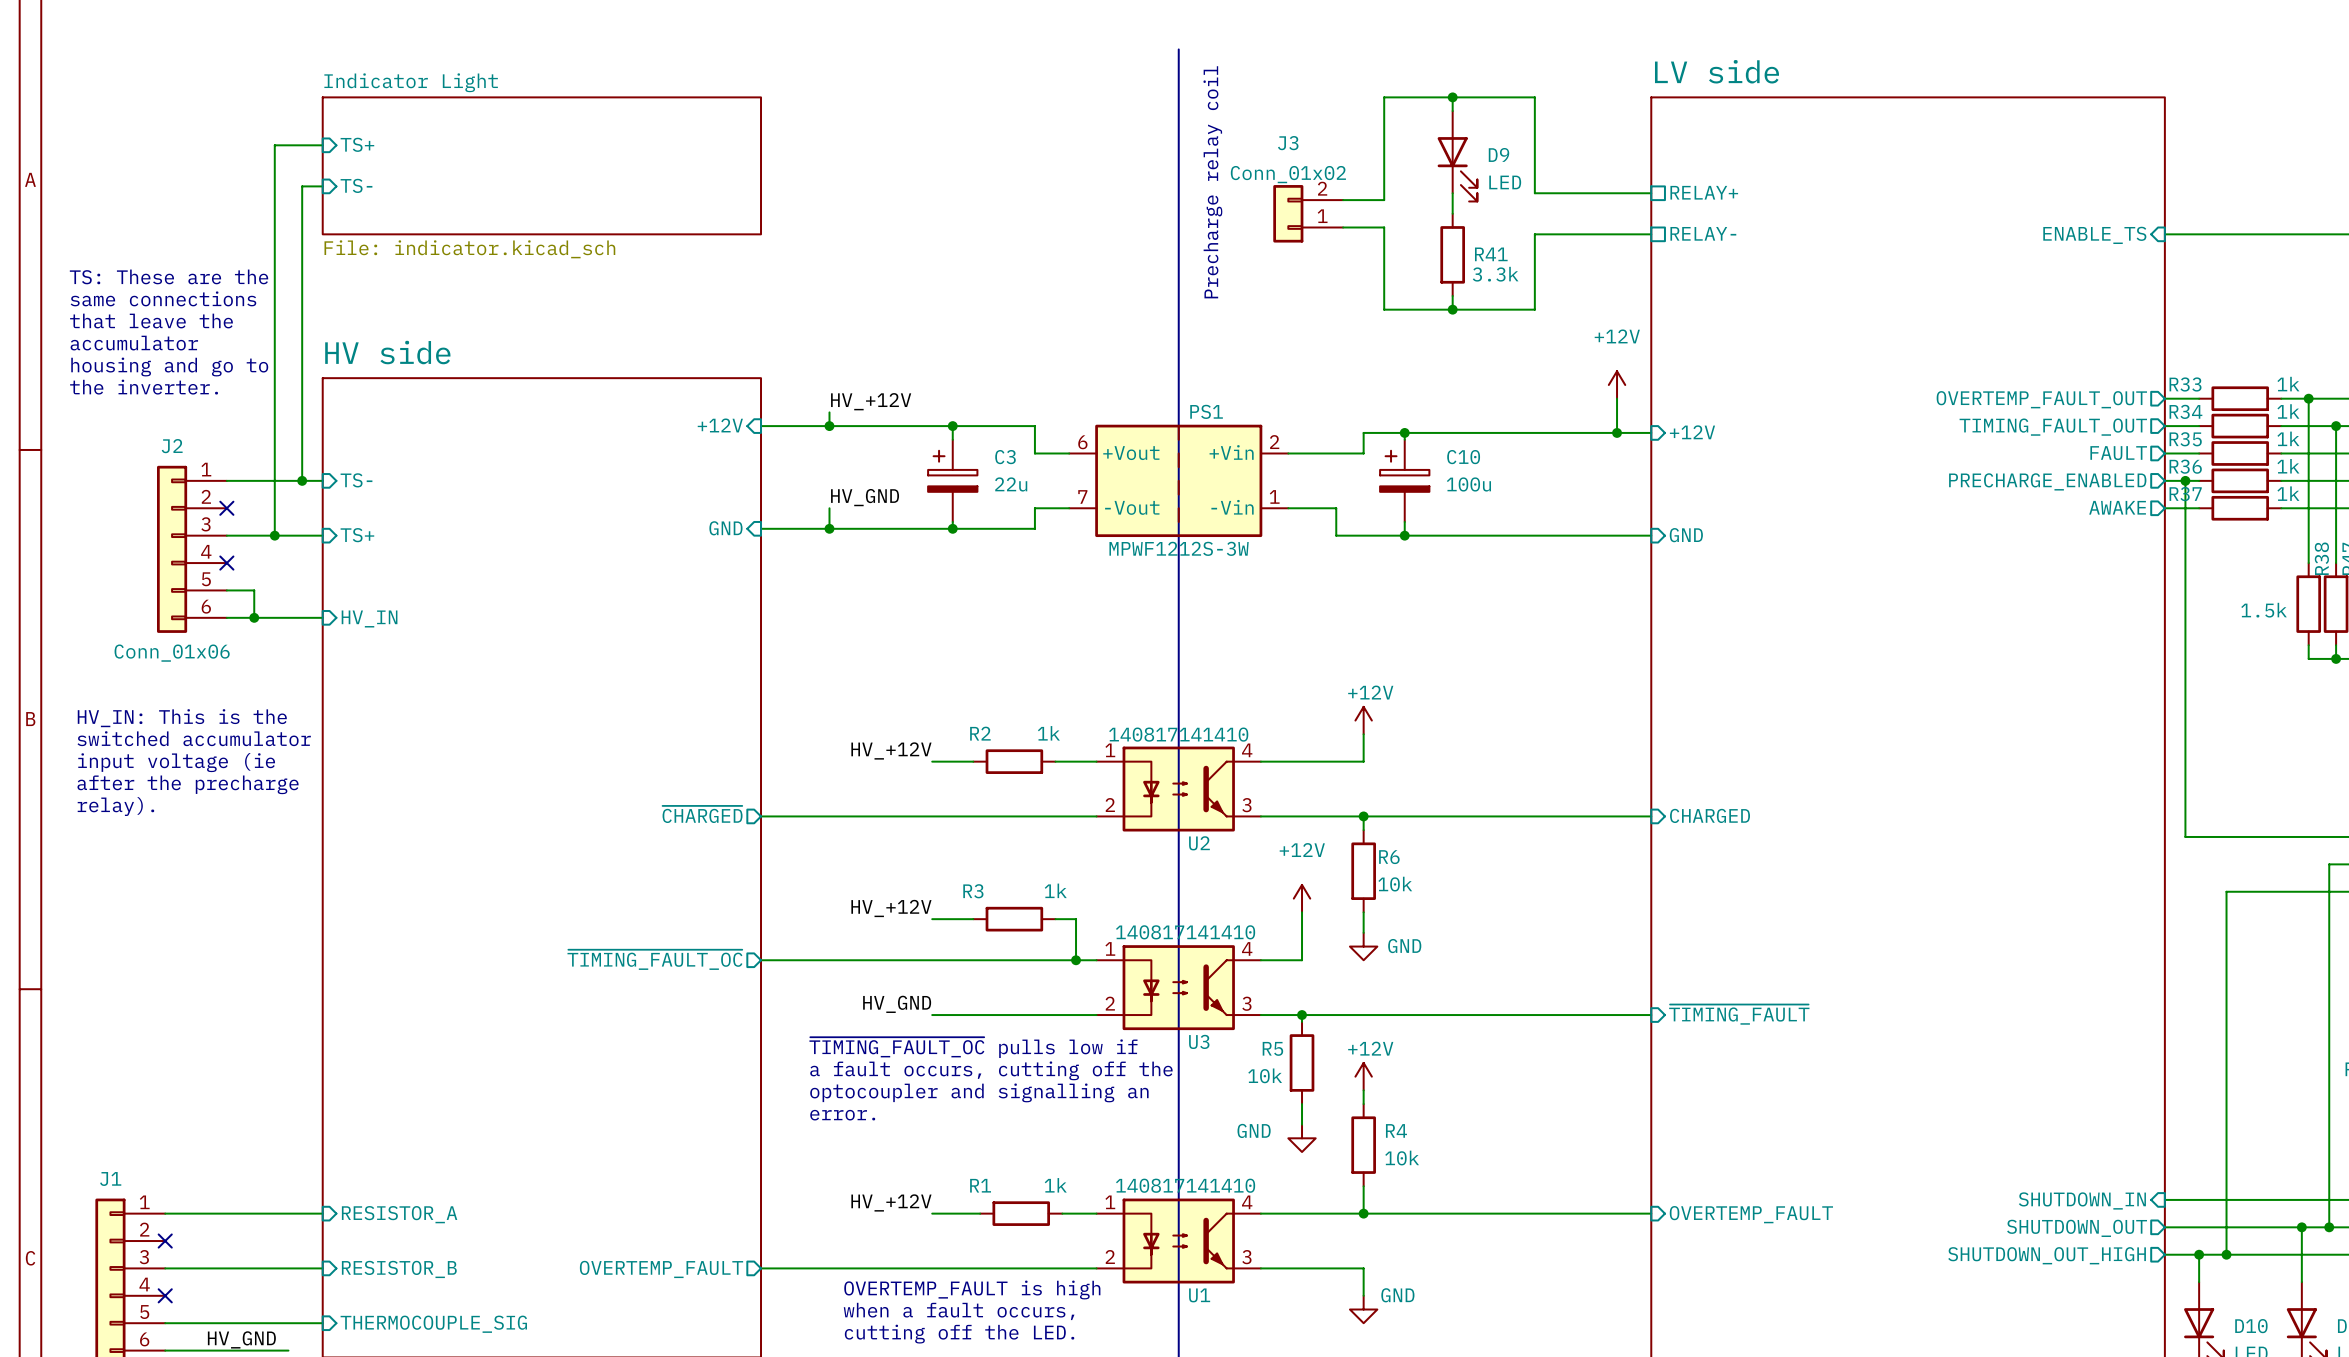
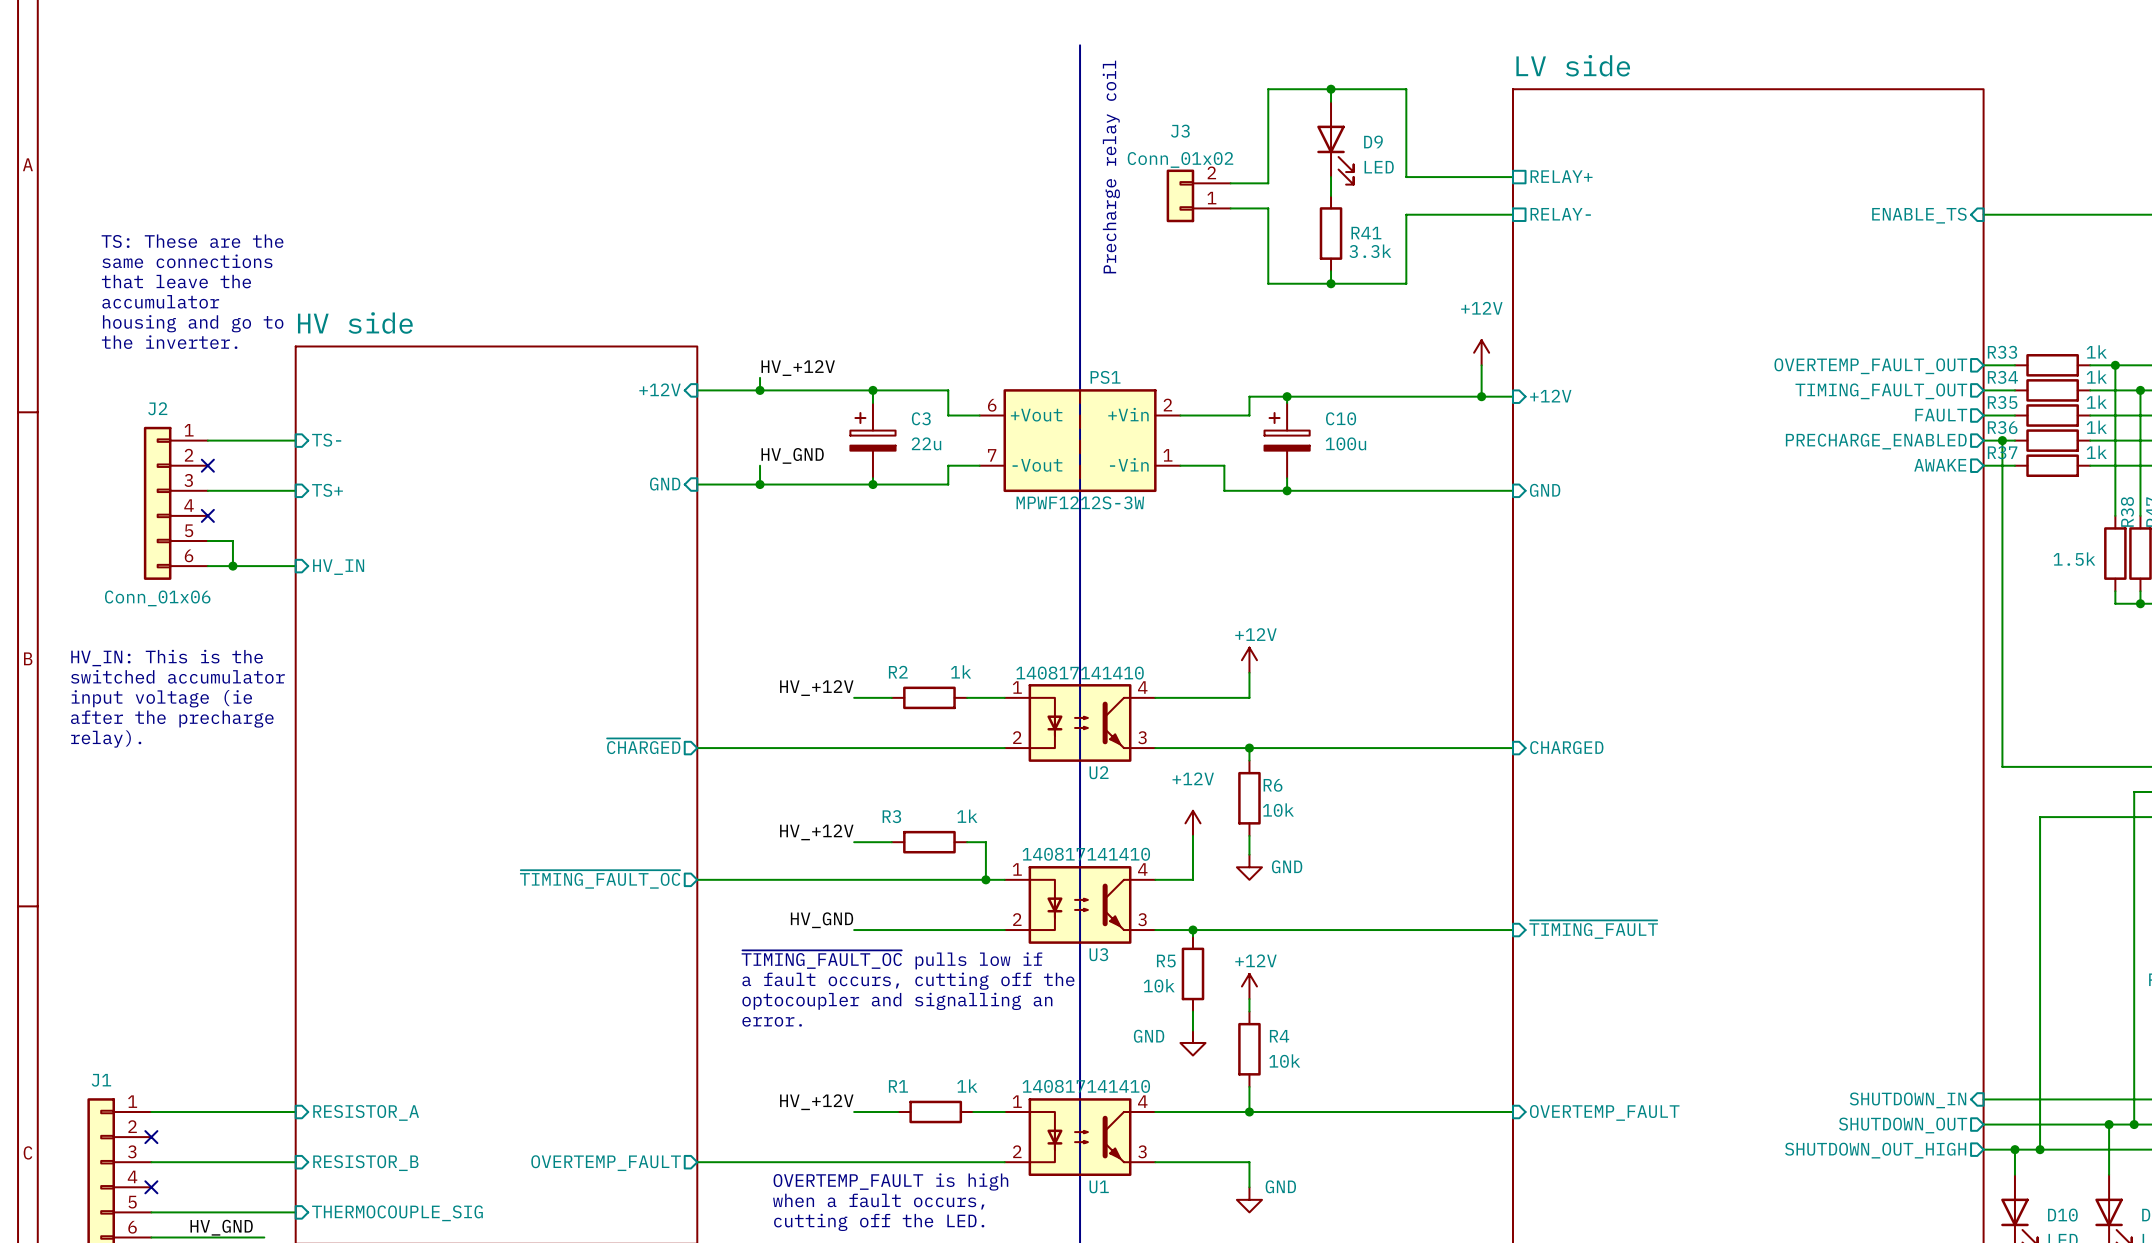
sheet pin: TS+ (357, 144) -> none
wire: (322, 145) (274, 145) (274, 535) -> none
sheet Indicator Light: File: indicator.kicad_sch (541, 165) -> none
sheet pin: TS- (356, 185) -> none
wire: (322, 186) (302, 186) (302, 480) -> none
text position: TS: These are the (169, 276) -> TS: These are the (192, 241)
text position: same connections (163, 298) -> same connections (187, 261)
text position: that leave the (151, 321) -> that leave the (176, 281)
text position: accumulator (134, 343) -> accumulator (160, 301)
text position: housing and go to (169, 367) -> housing and go to (193, 323)
text position: the inverter. (144, 387) -> the inverter. (169, 342)
junction: (302, 480) -> none
junction: (274, 535) -> none

